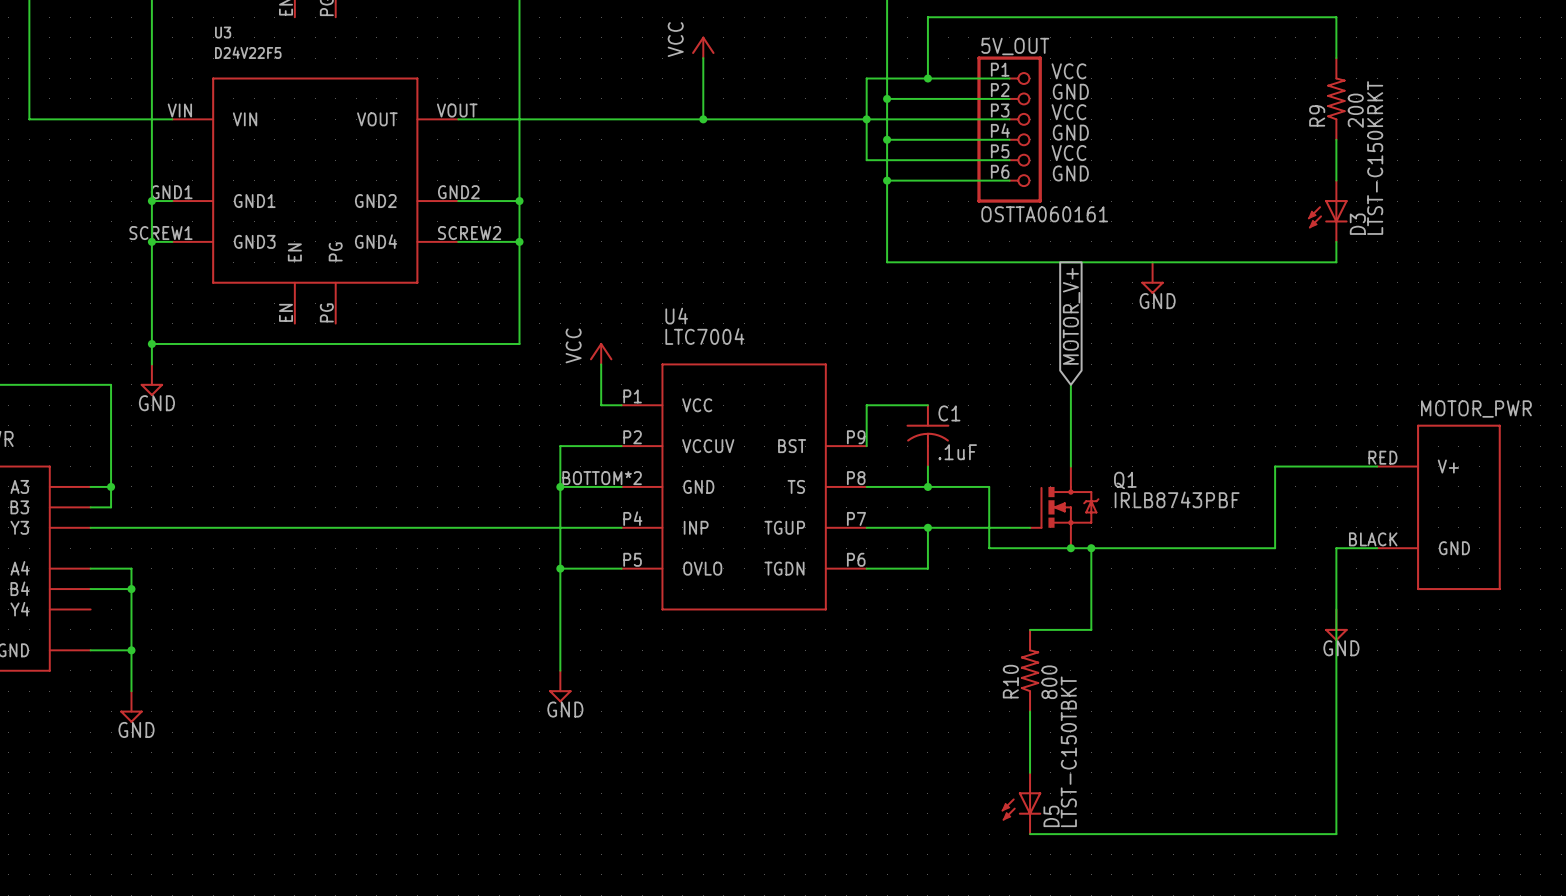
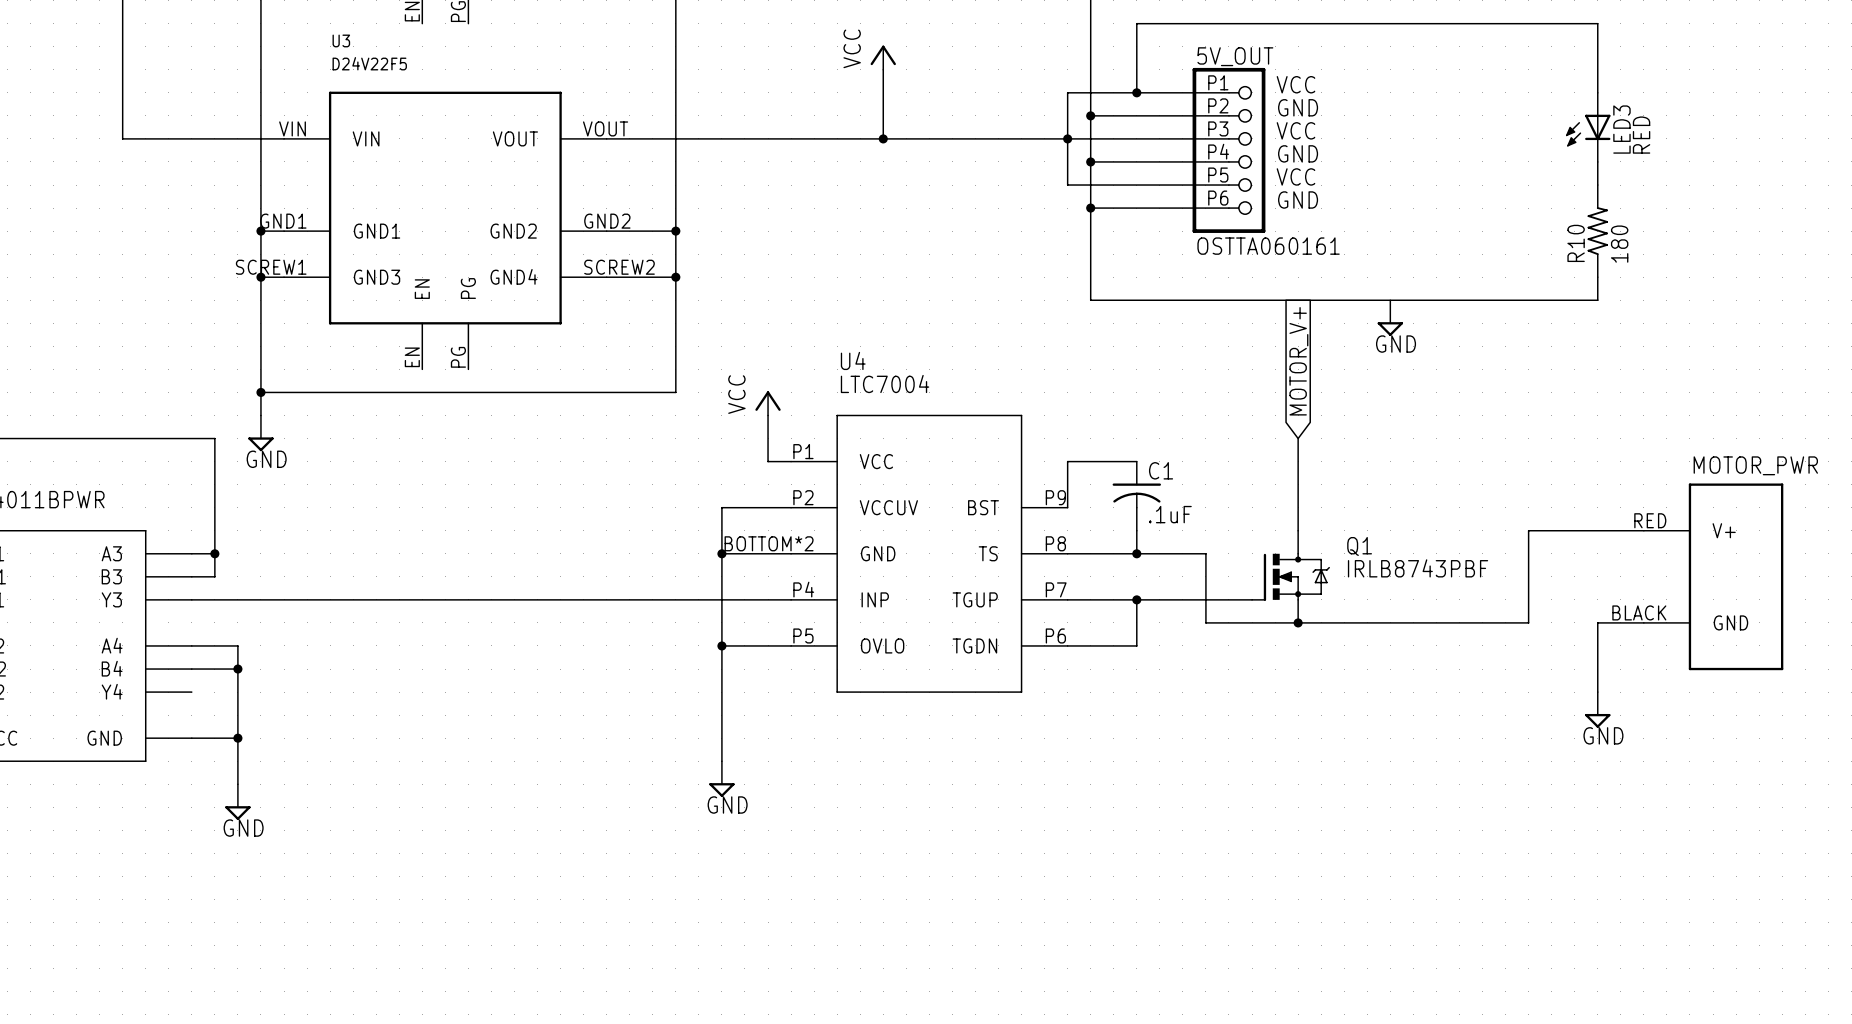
R9: 200 (1336, 98) -> none
LED3: none -> RED (1588, 127)
D3: LTST-C150KRKT (1327, 211) -> none
wire: (1091, 548) (1091, 629) (1030, 629) -> none
junction: (1091, 548) -> none
wire: (1336, 609) (1336, 834) (1030, 834) -> none
R10 position: (1030, 670) -> (1597, 231)
R10 value: 800 (1049, 682) -> 180 (1619, 244)
wire: (1030, 711) (1030, 772) -> none
D5: LTST-C150TBKT (1021, 803) -> none

